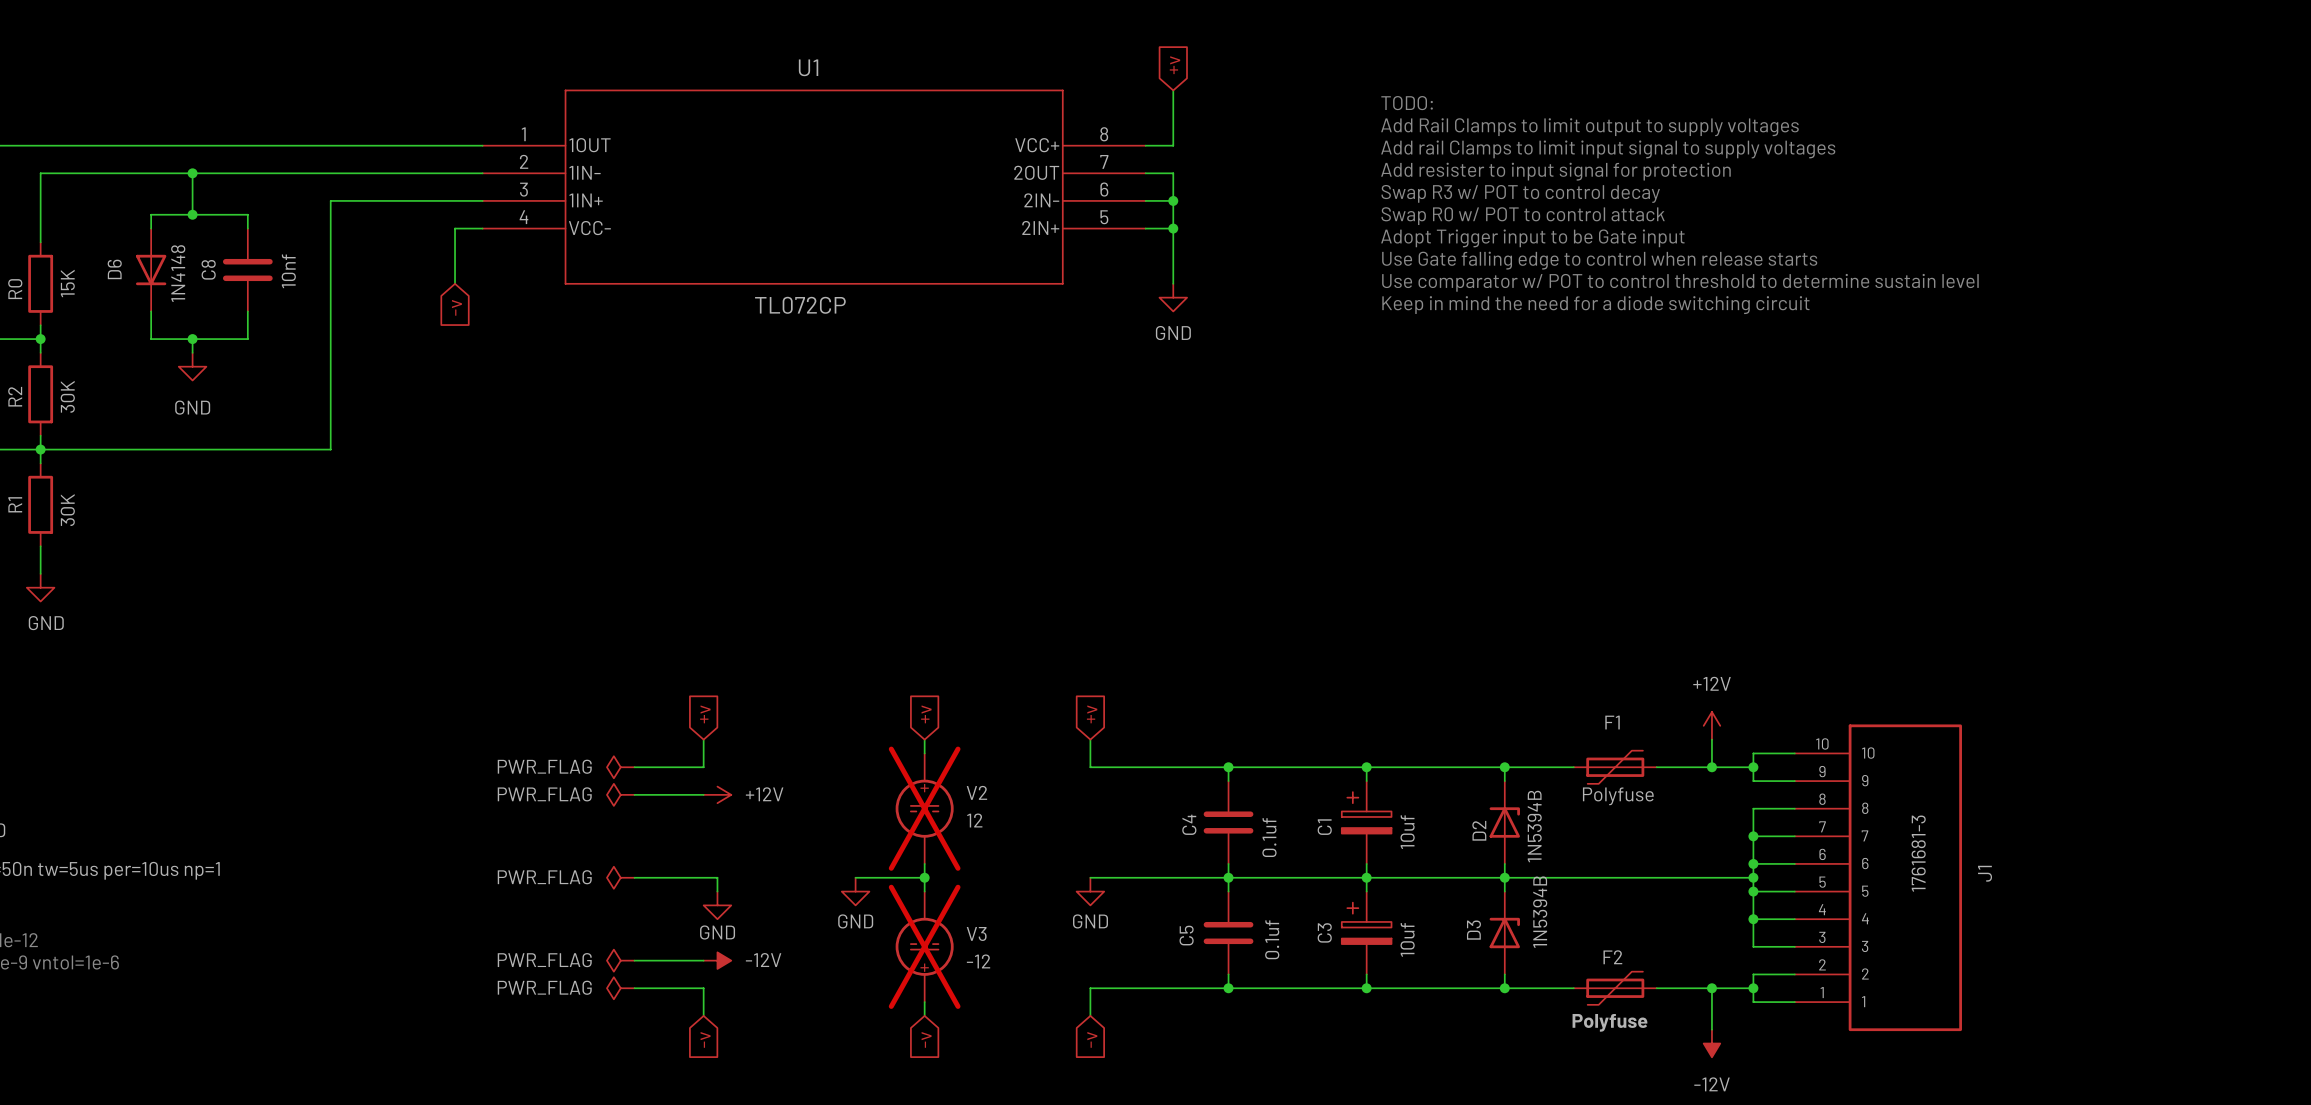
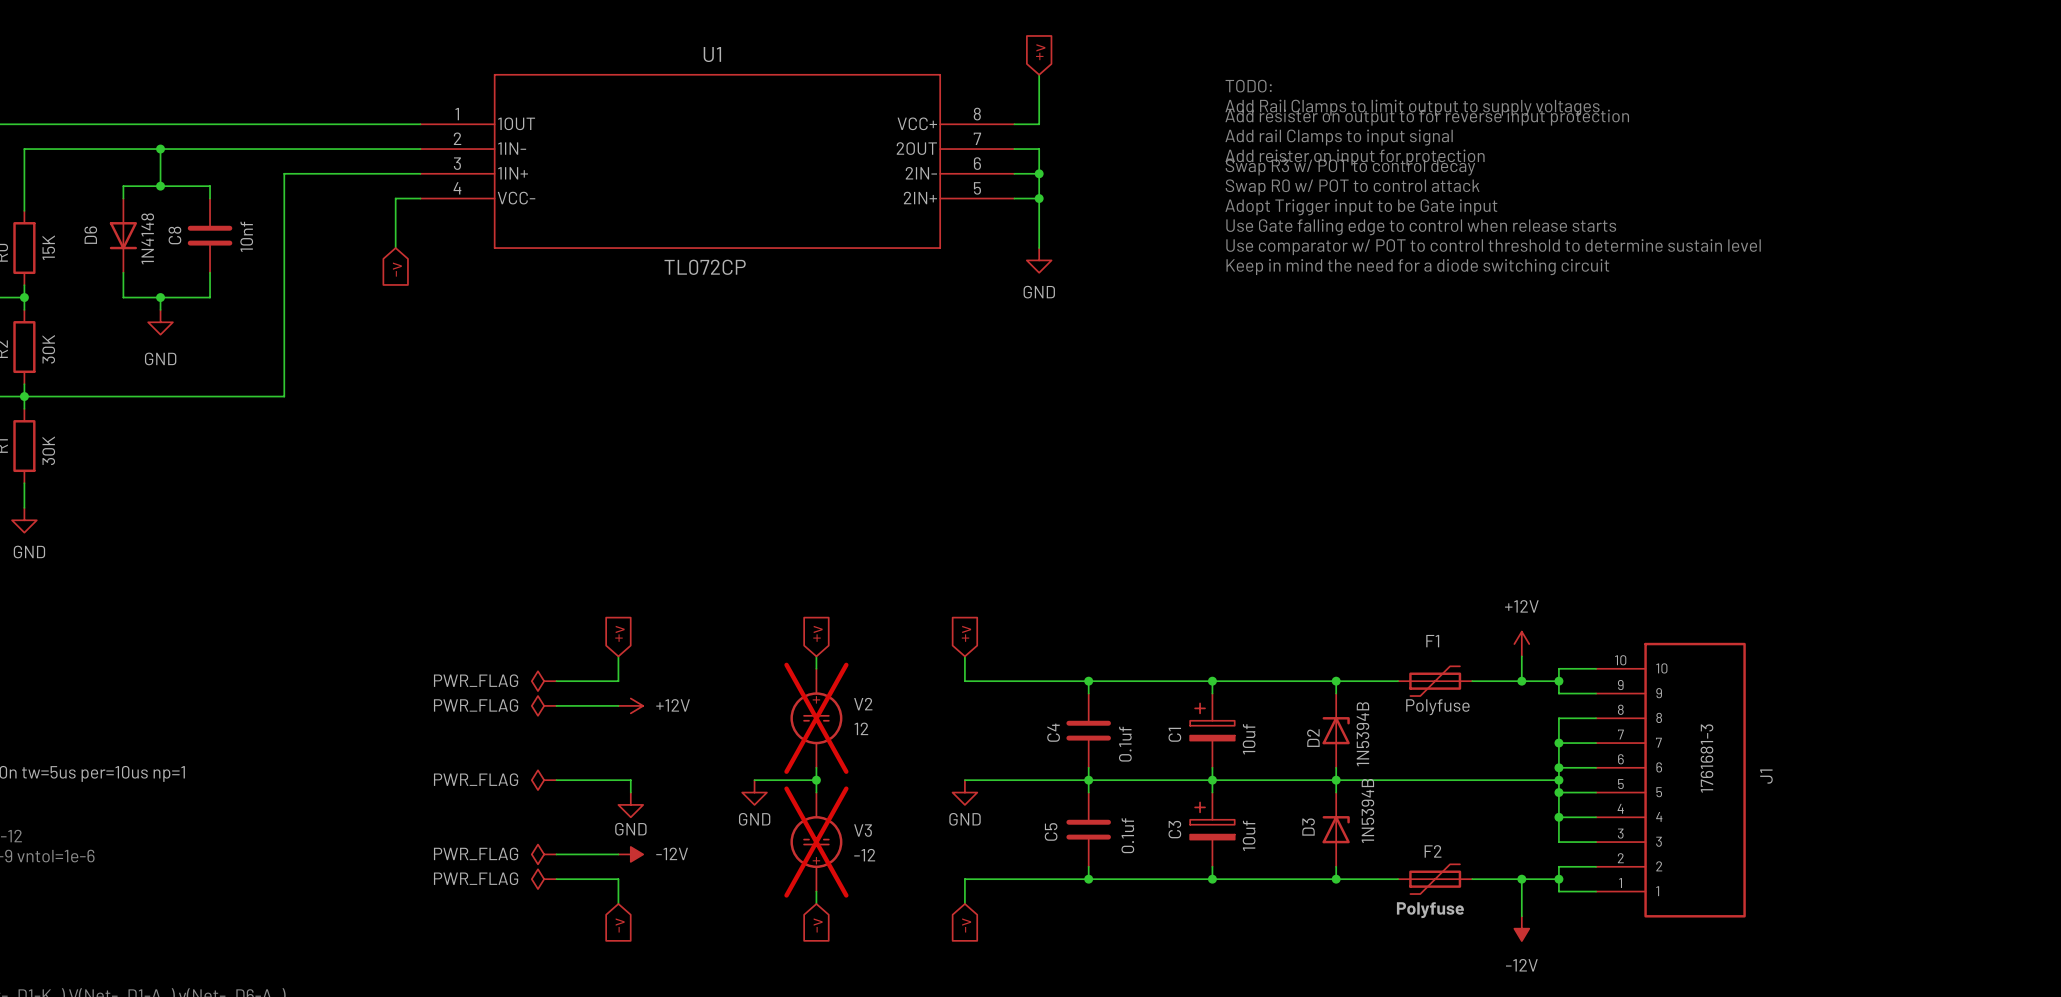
text: none -> Add resister on output to for reverse input protection (1427, 117)
text: Add rail Clamps to limit input signal to supply voltages (1608, 149) -> Add rail Clamps to input signal (1339, 137)
text: Add resister to input signal for protection (1555, 171) -> Add reister on input for protection (1354, 157)

